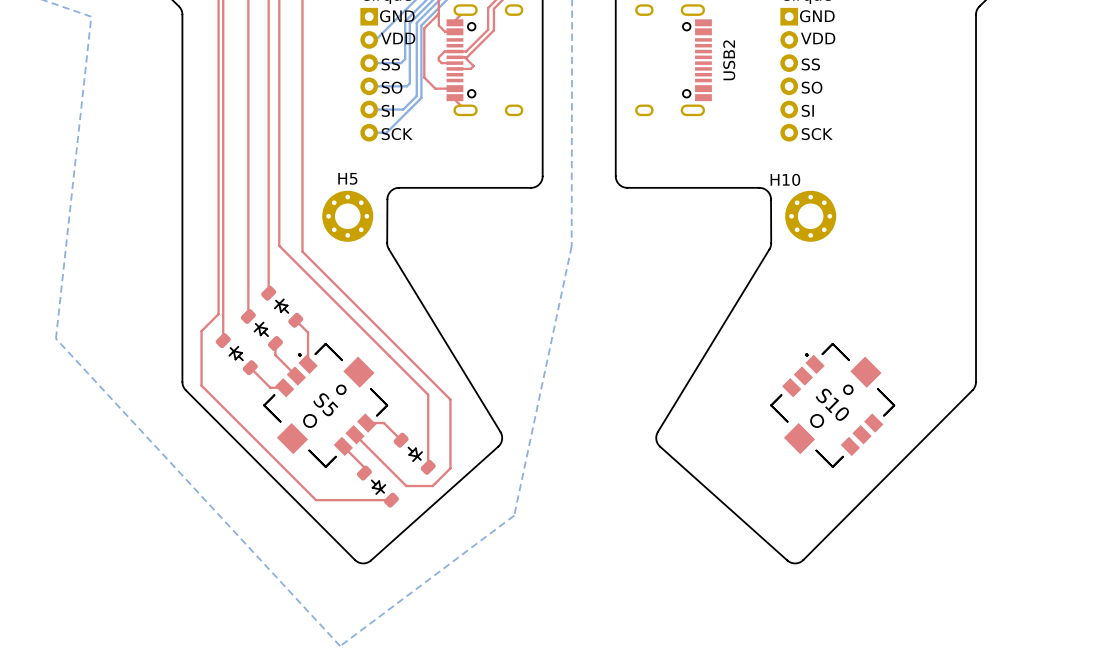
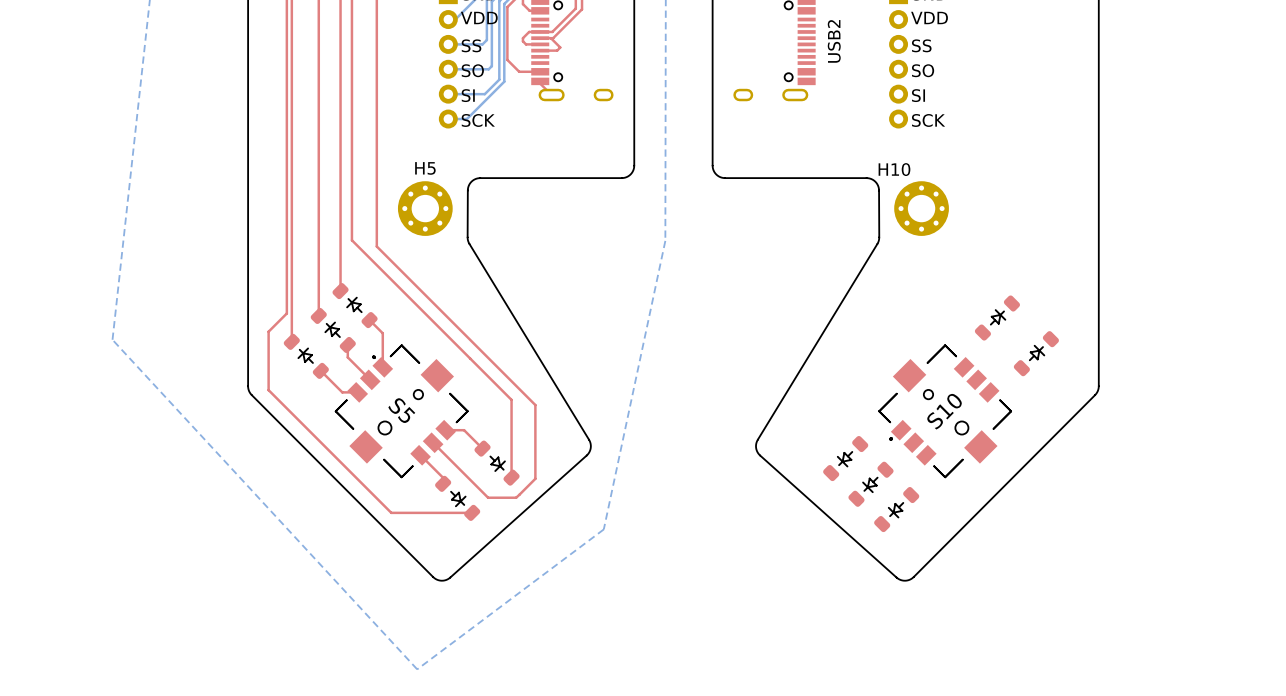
part: none -> (997, 318)
part: none -> (1036, 353)
S10 rotation: 0° (832, 405) -> 90° counterclockwise (945, 411)
part: none -> (845, 458)
part: none -> (870, 484)
part: none -> (896, 509)

